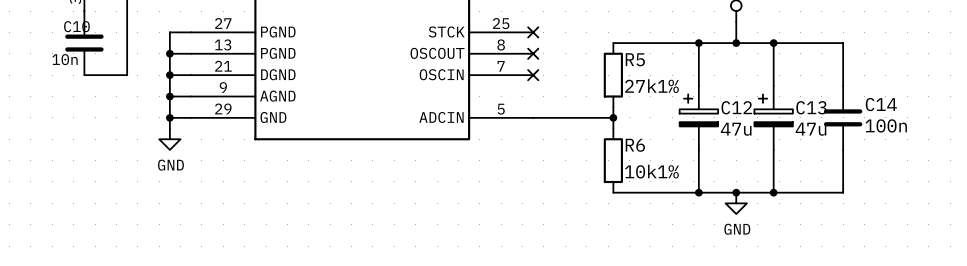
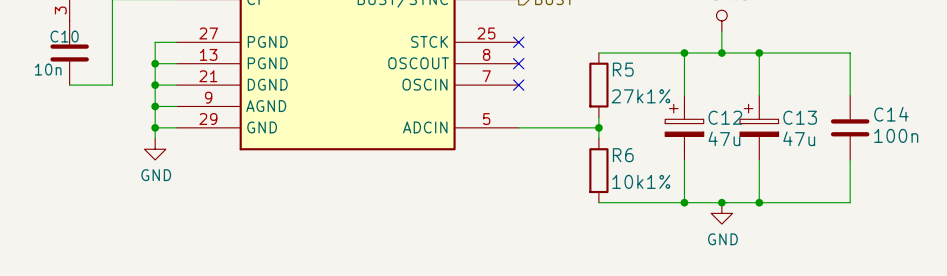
wire: (843, 43) (843, 85) -> (828, 53) (850, 53) (850, 95)
C14 position: (843, 117) -> (850, 127)
wire: (843, 149) (843, 192) -> (850, 159) (850, 202) (828, 202)

